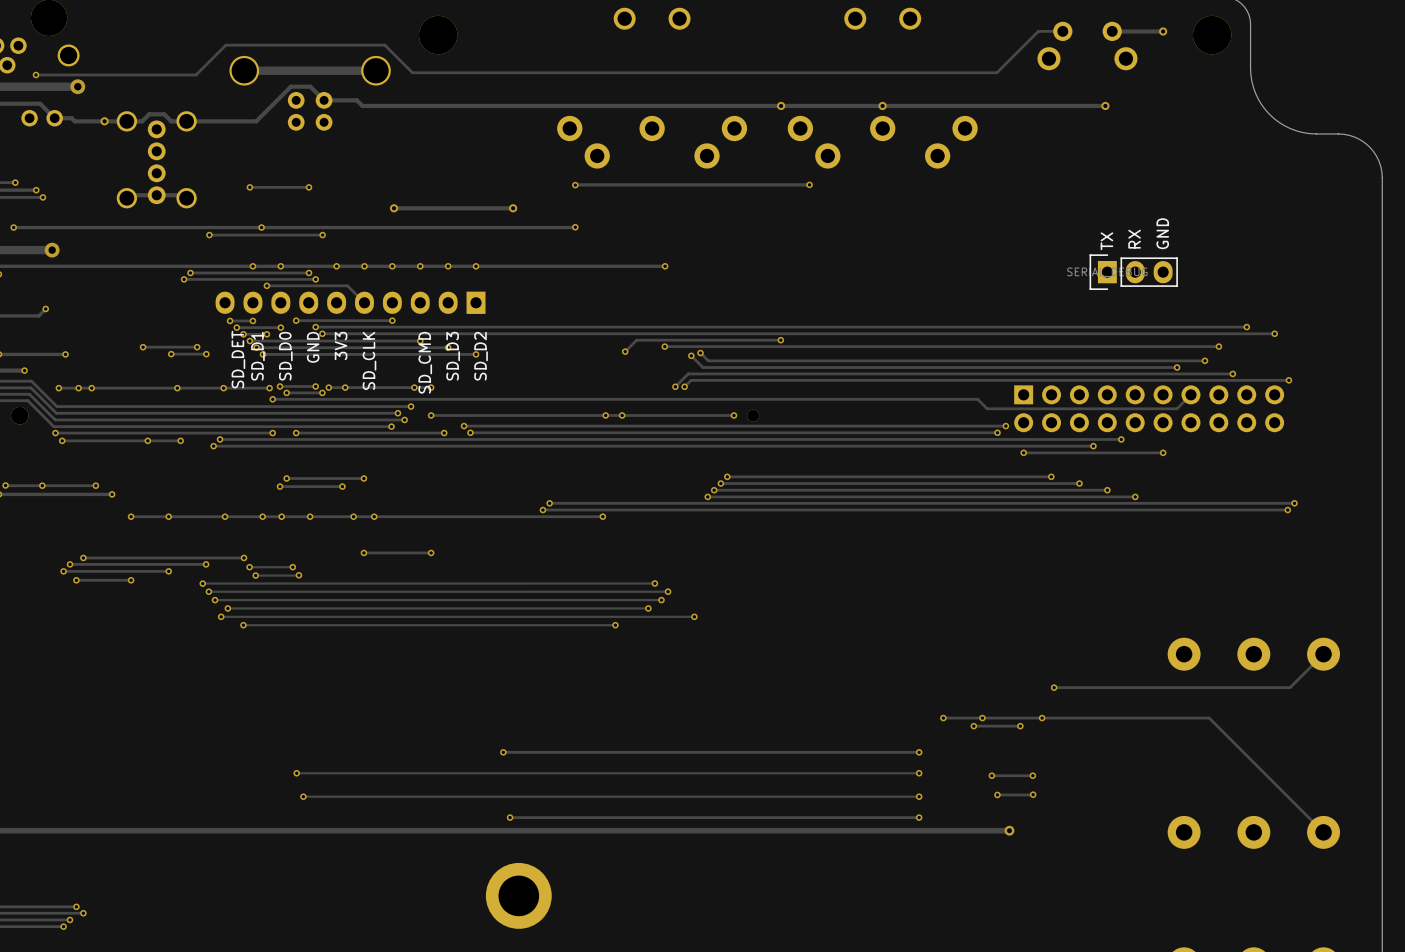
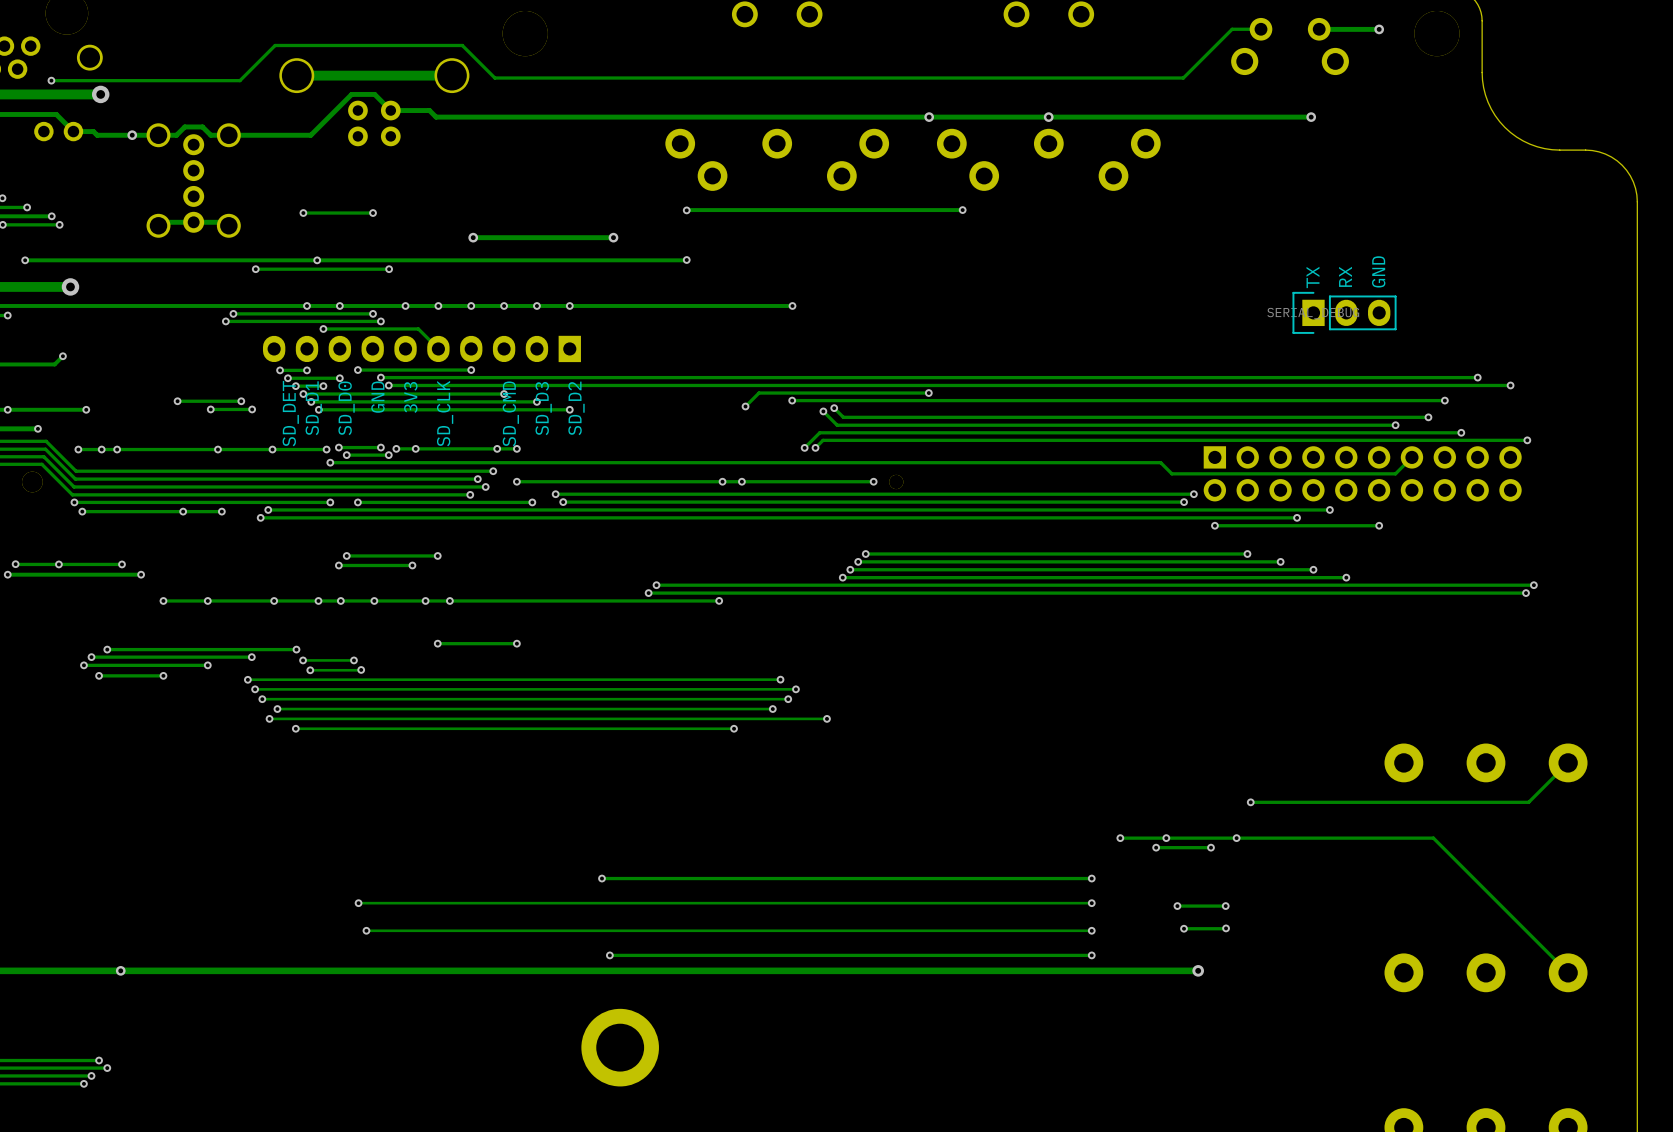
via: none -> (120, 970)

